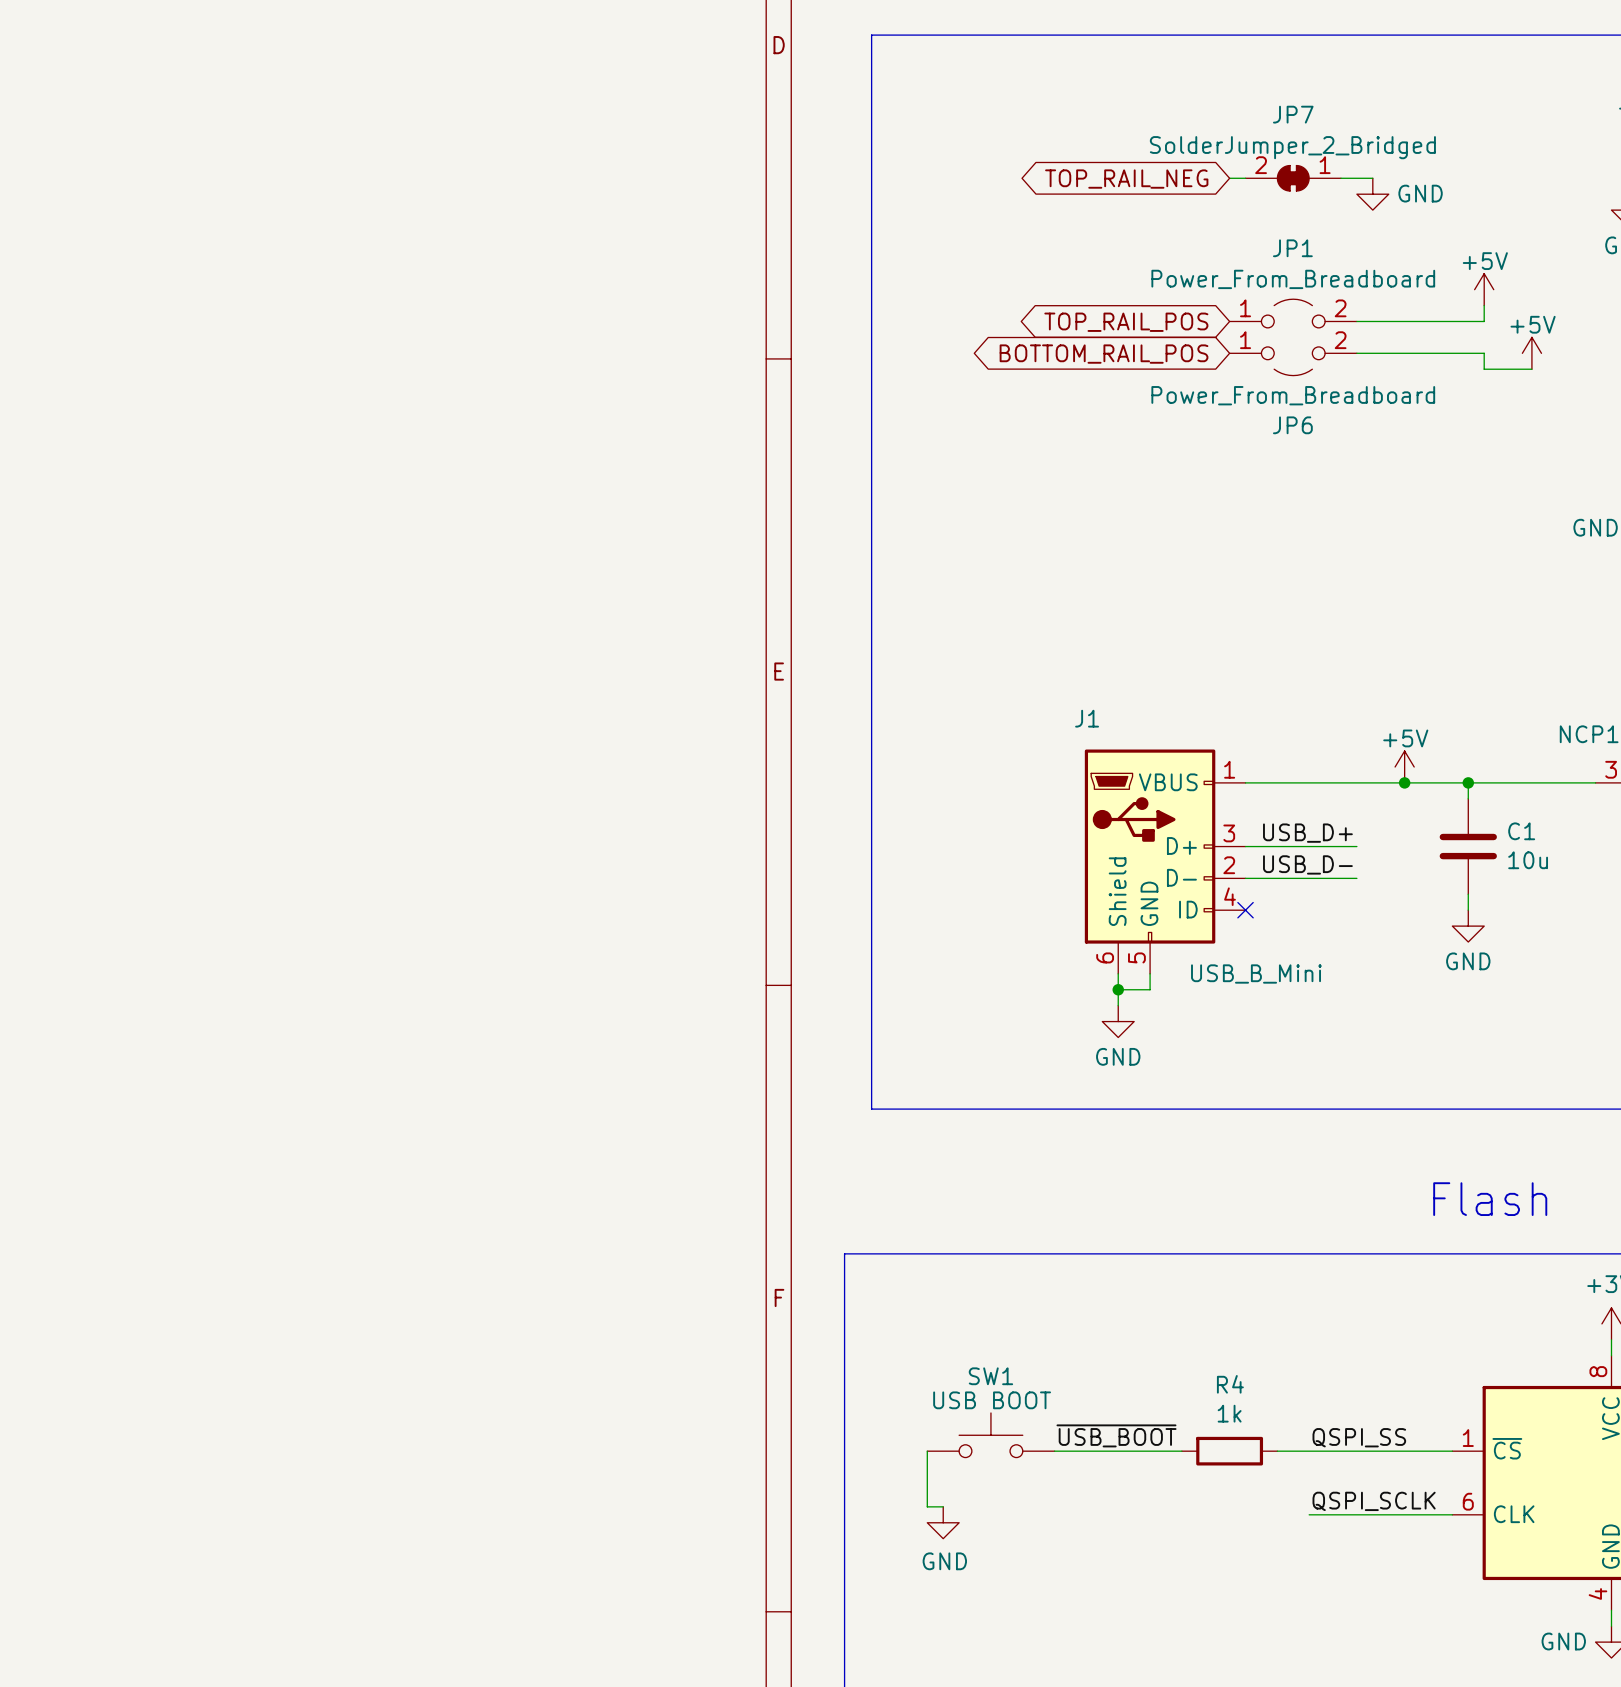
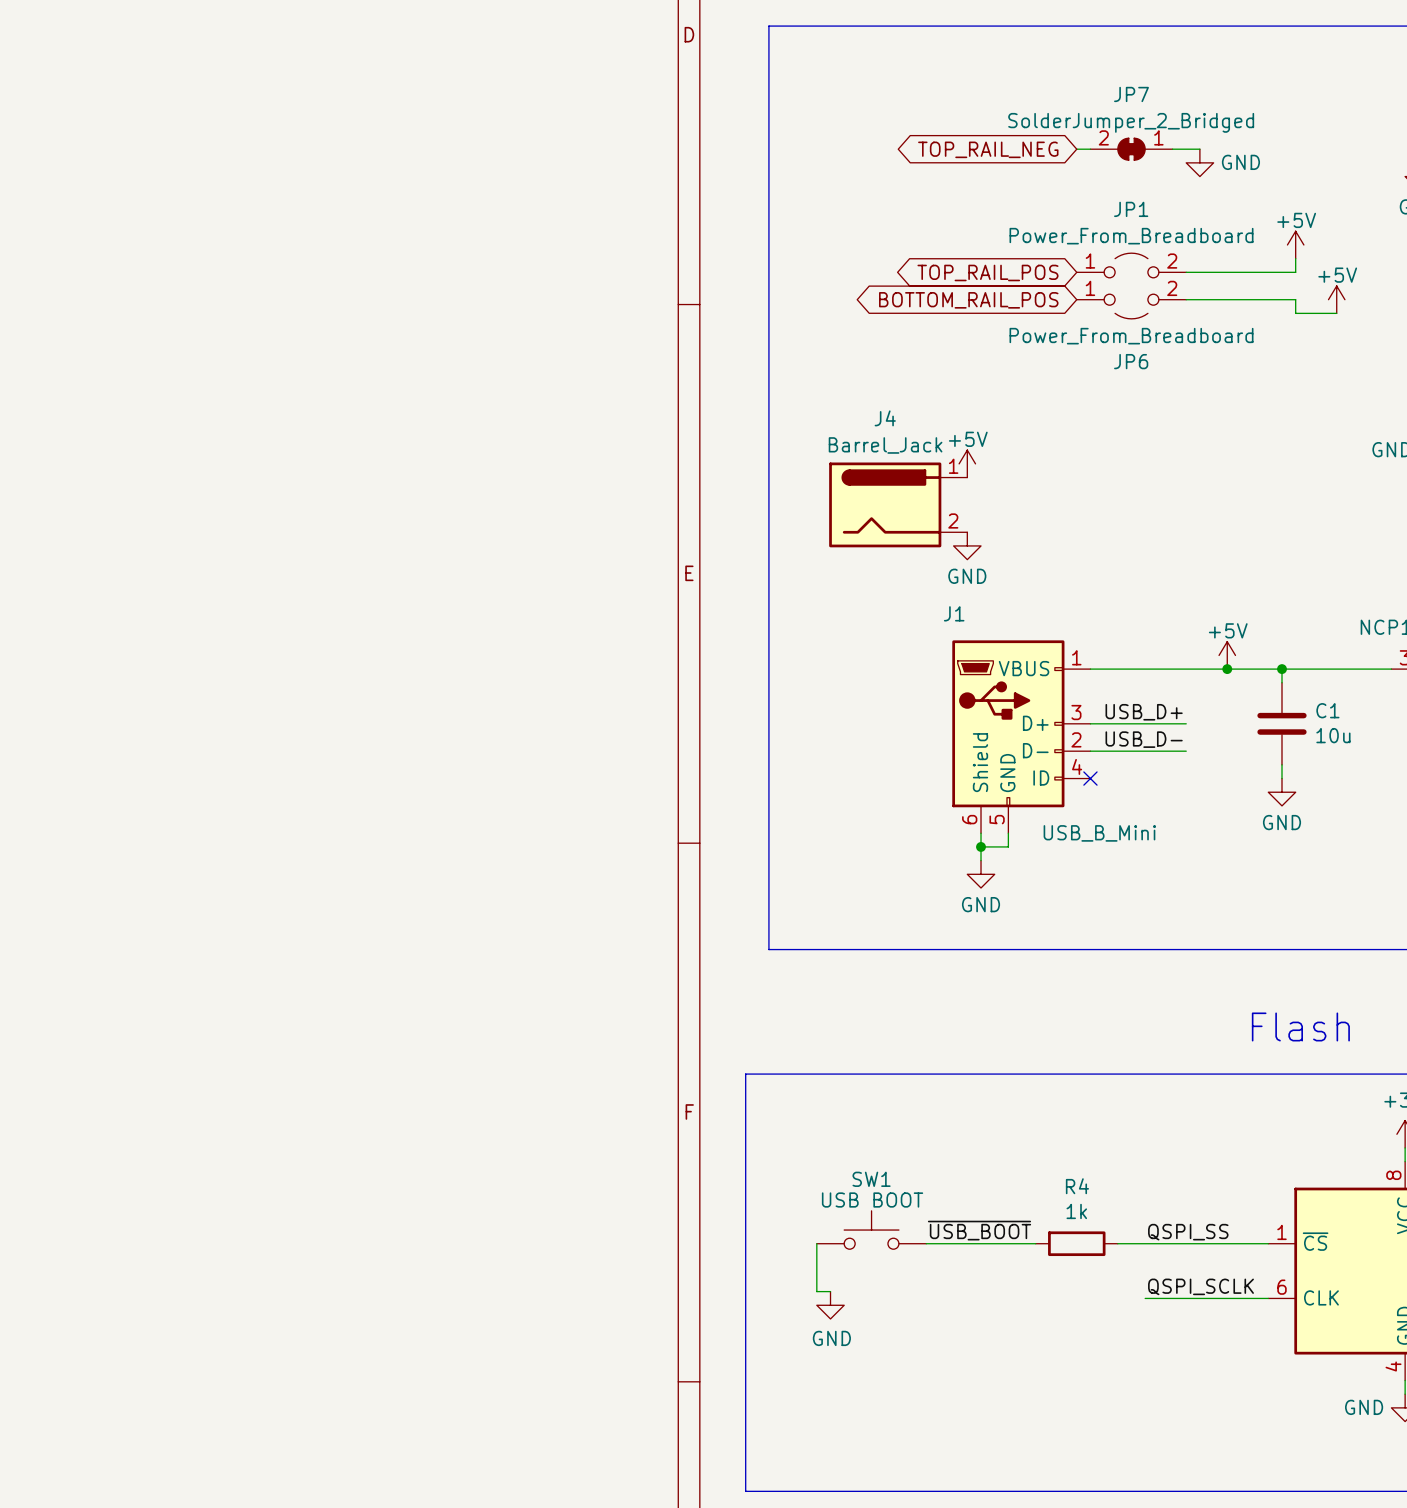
power symbol: none -> +5V (967, 463)
J4: none -> Barrel_Jack (898, 504)
power symbol: none -> GND (967, 545)

